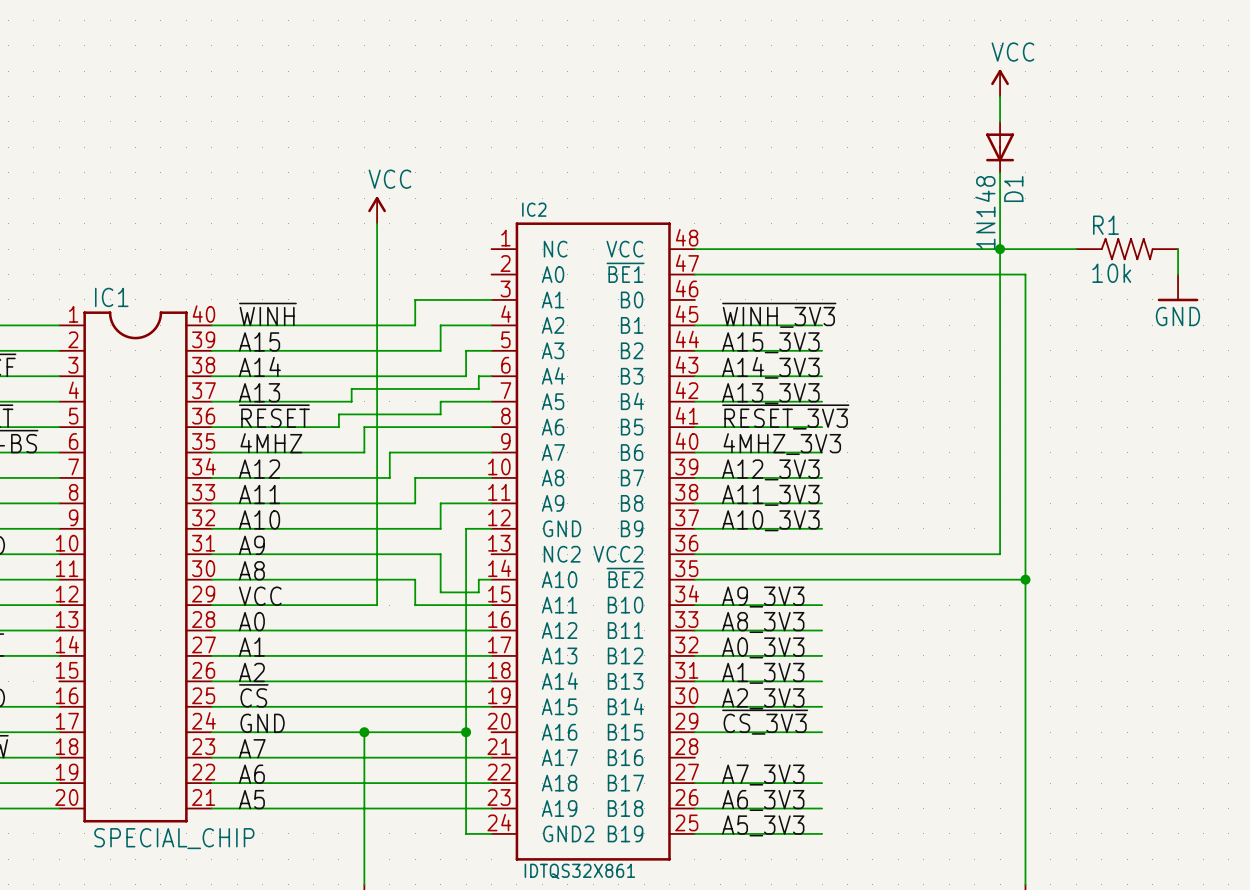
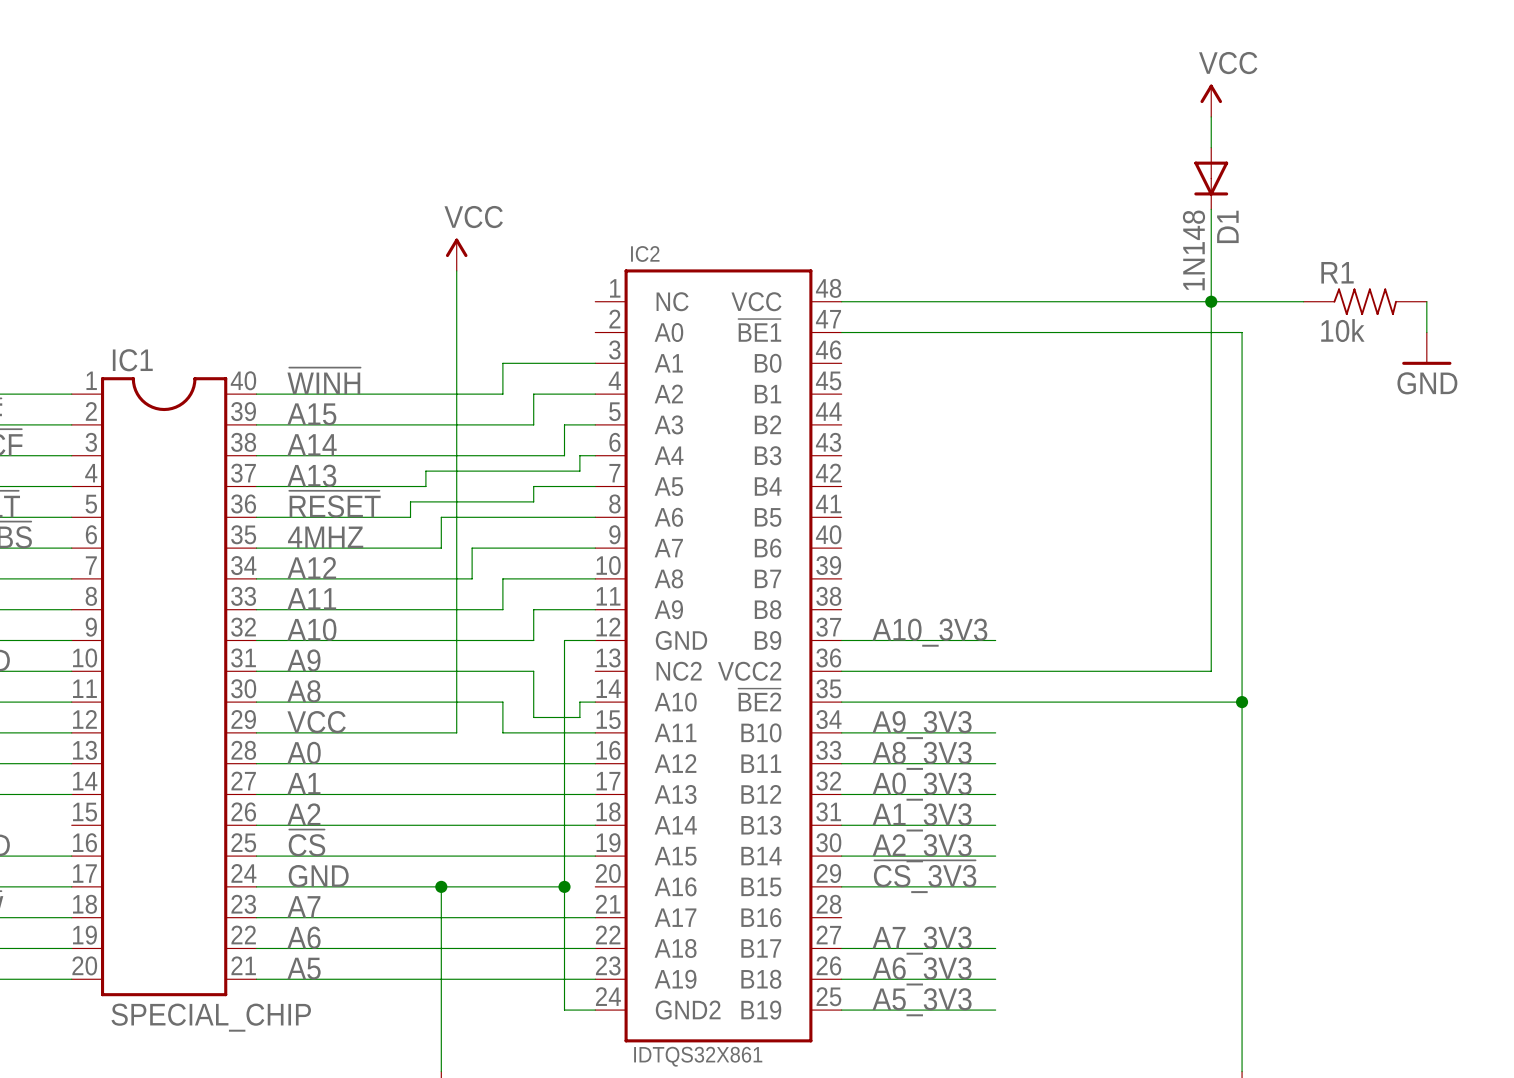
label: ~{WINH_3V3} (779, 315) -> none
wire: (694, 325) (822, 325) -> none
label: A15_3V3 (770, 342) -> none
wire: (694, 350) (822, 350) -> none
label: A14_3V3 (770, 367) -> none
wire: (694, 376) (822, 376) -> none
label: A13_3V3 (770, 393) -> none
wire: (694, 401) (822, 401) -> none
label: ~{RESET_3V3} (785, 417) -> none
wire: (694, 427) (822, 427) -> none
label: 4MHZ_3V3 (782, 444) -> none
wire: (694, 452) (822, 452) -> none
label: A12_3V3 (770, 469) -> none
wire: (694, 477) (822, 477) -> none
label: A11_3V3 (770, 495) -> none
wire: (694, 503) (822, 503) -> none

